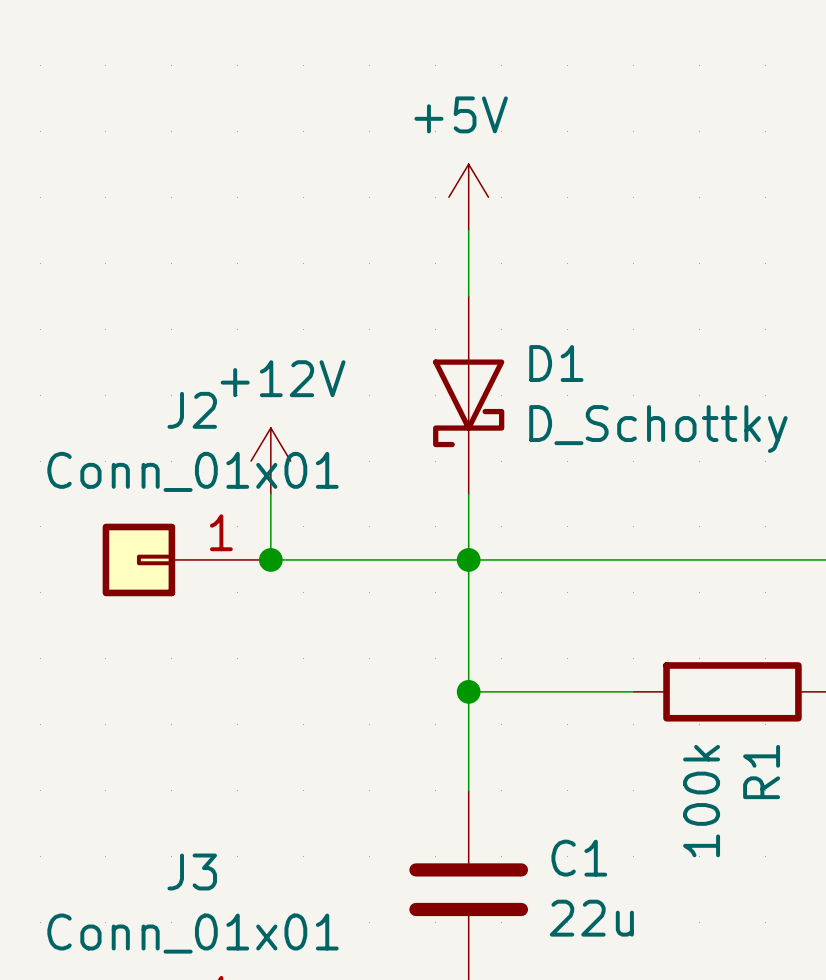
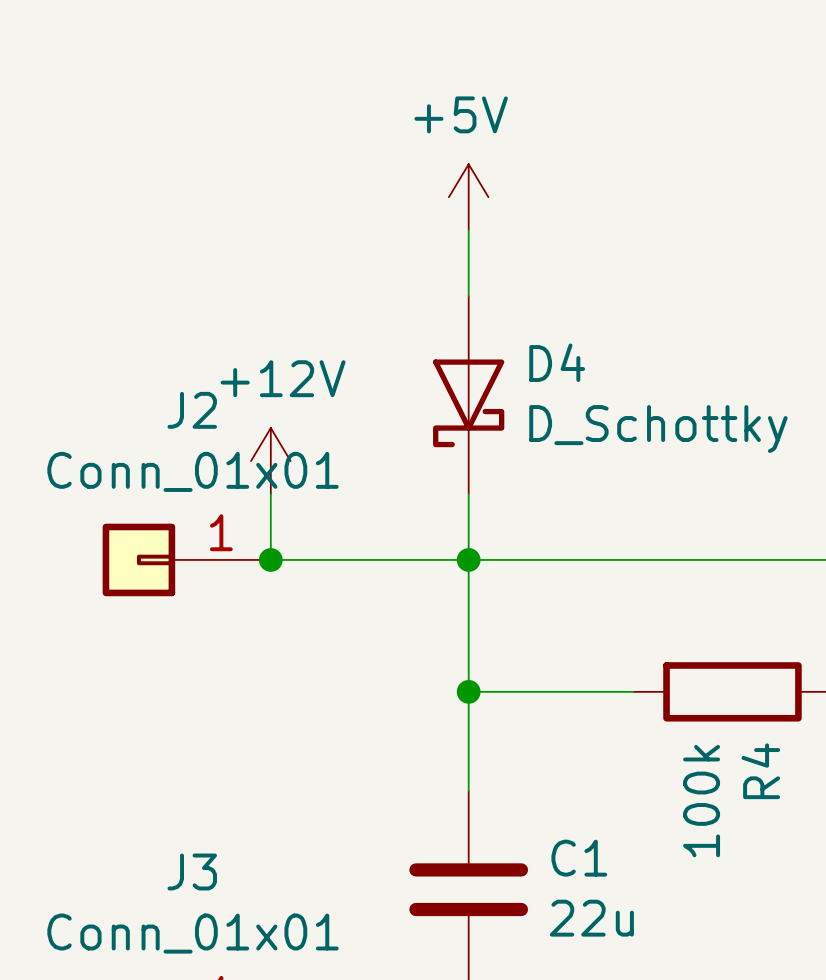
D1 name: D1 (556, 363) -> D4 (557, 362)
R1 name: R1 (761, 772) -> R4 (760, 771)

